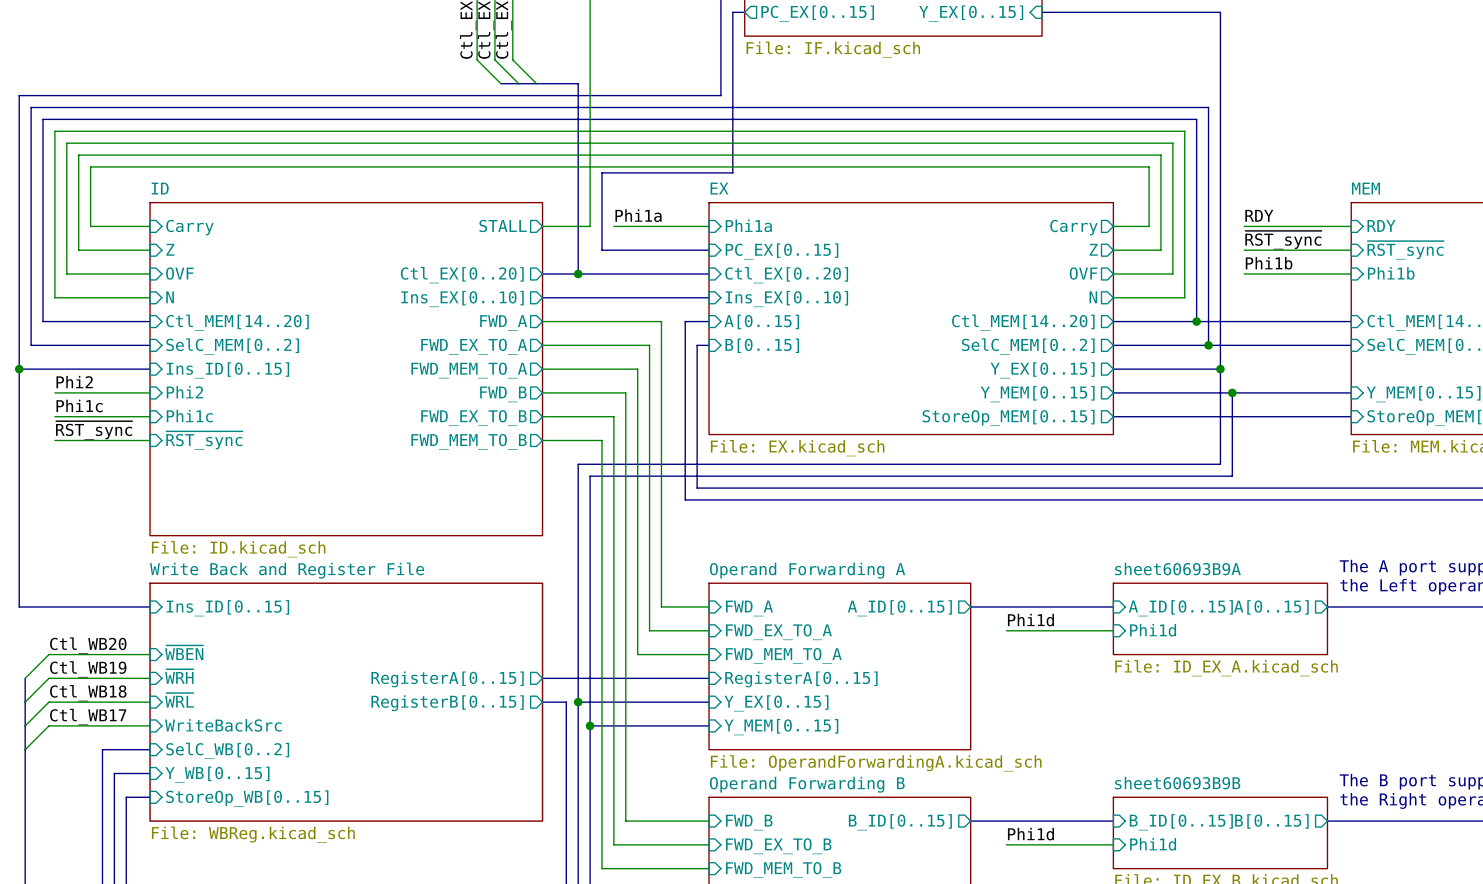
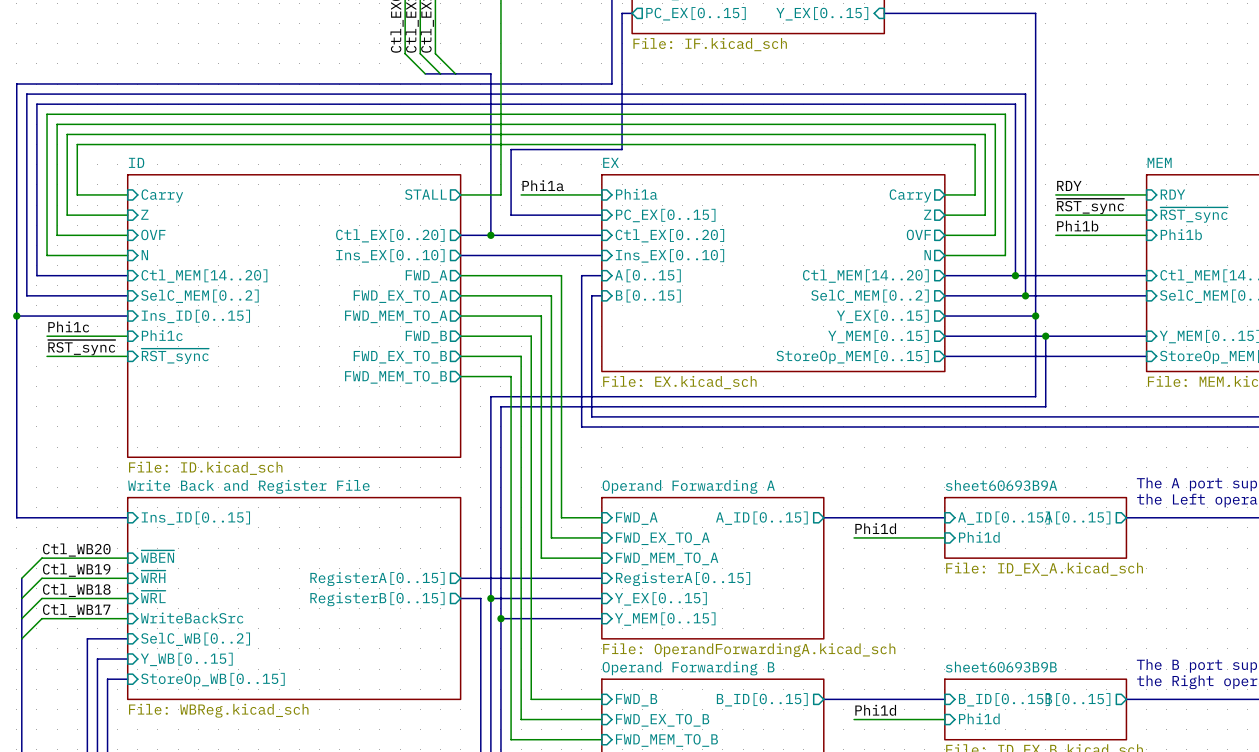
label: Phi2 (74, 382) -> Phi1c (68, 326)
sheet pin: Phi2 (184, 392) -> Phi1c (162, 335)
label: Phi1c (79, 405) -> ~{RST_sync} (81, 347)
sheet pin: Phi1c (189, 416) -> ~{RST_sync} (175, 356)
label: ~{RST_sync} (94, 430) -> none
wire: (54, 440) (150, 440) -> none
sheet pin: ~{RST_sync} (204, 440) -> none

